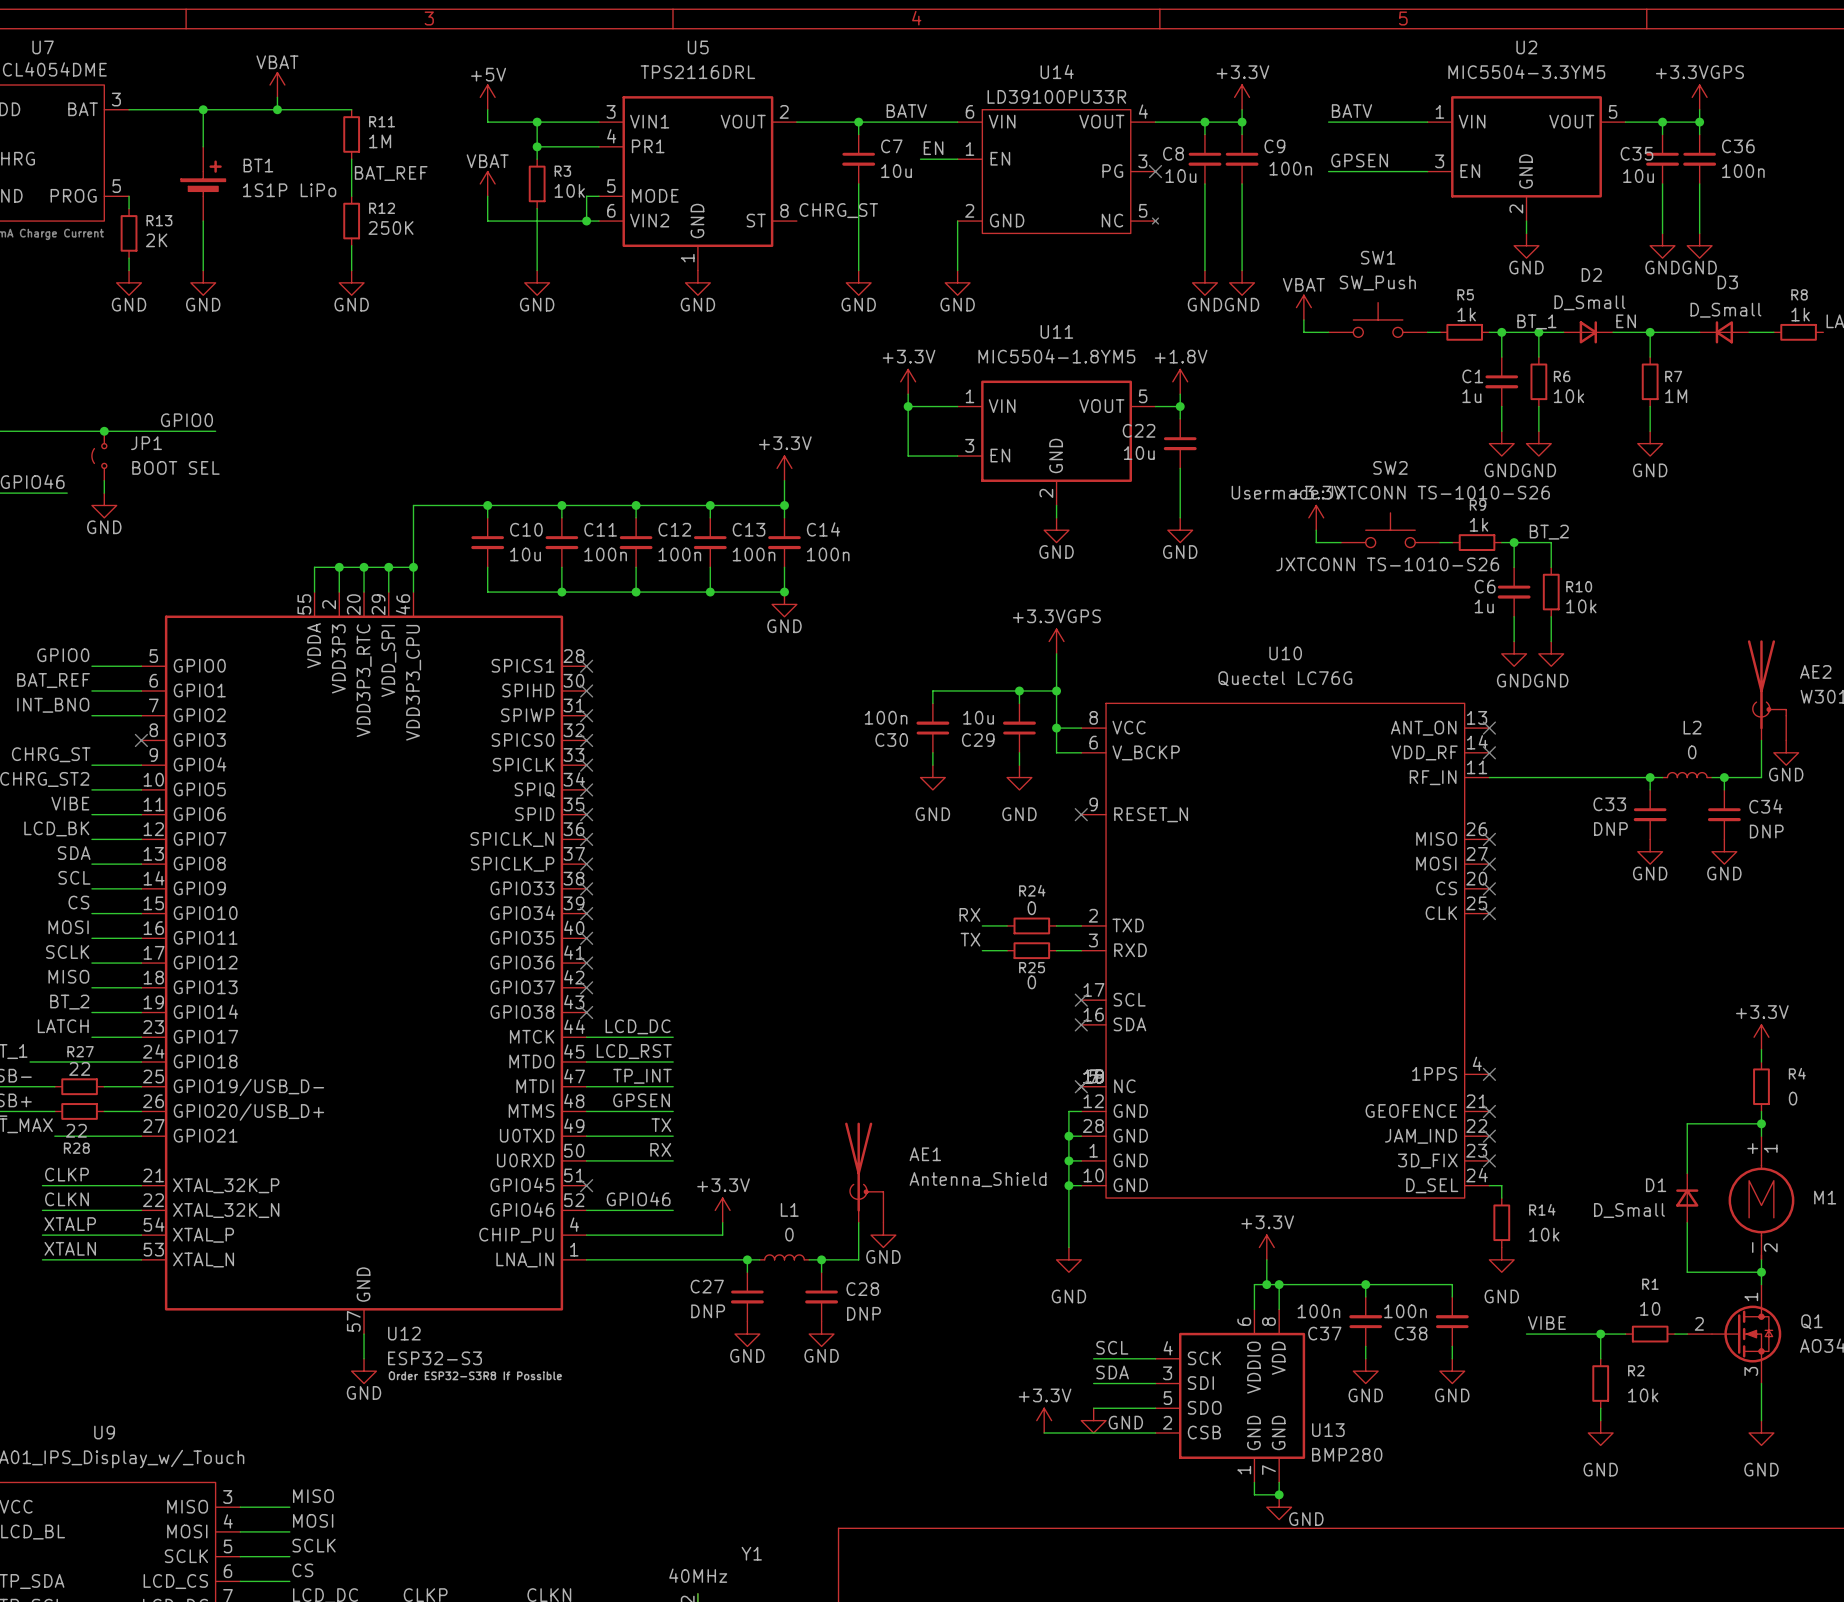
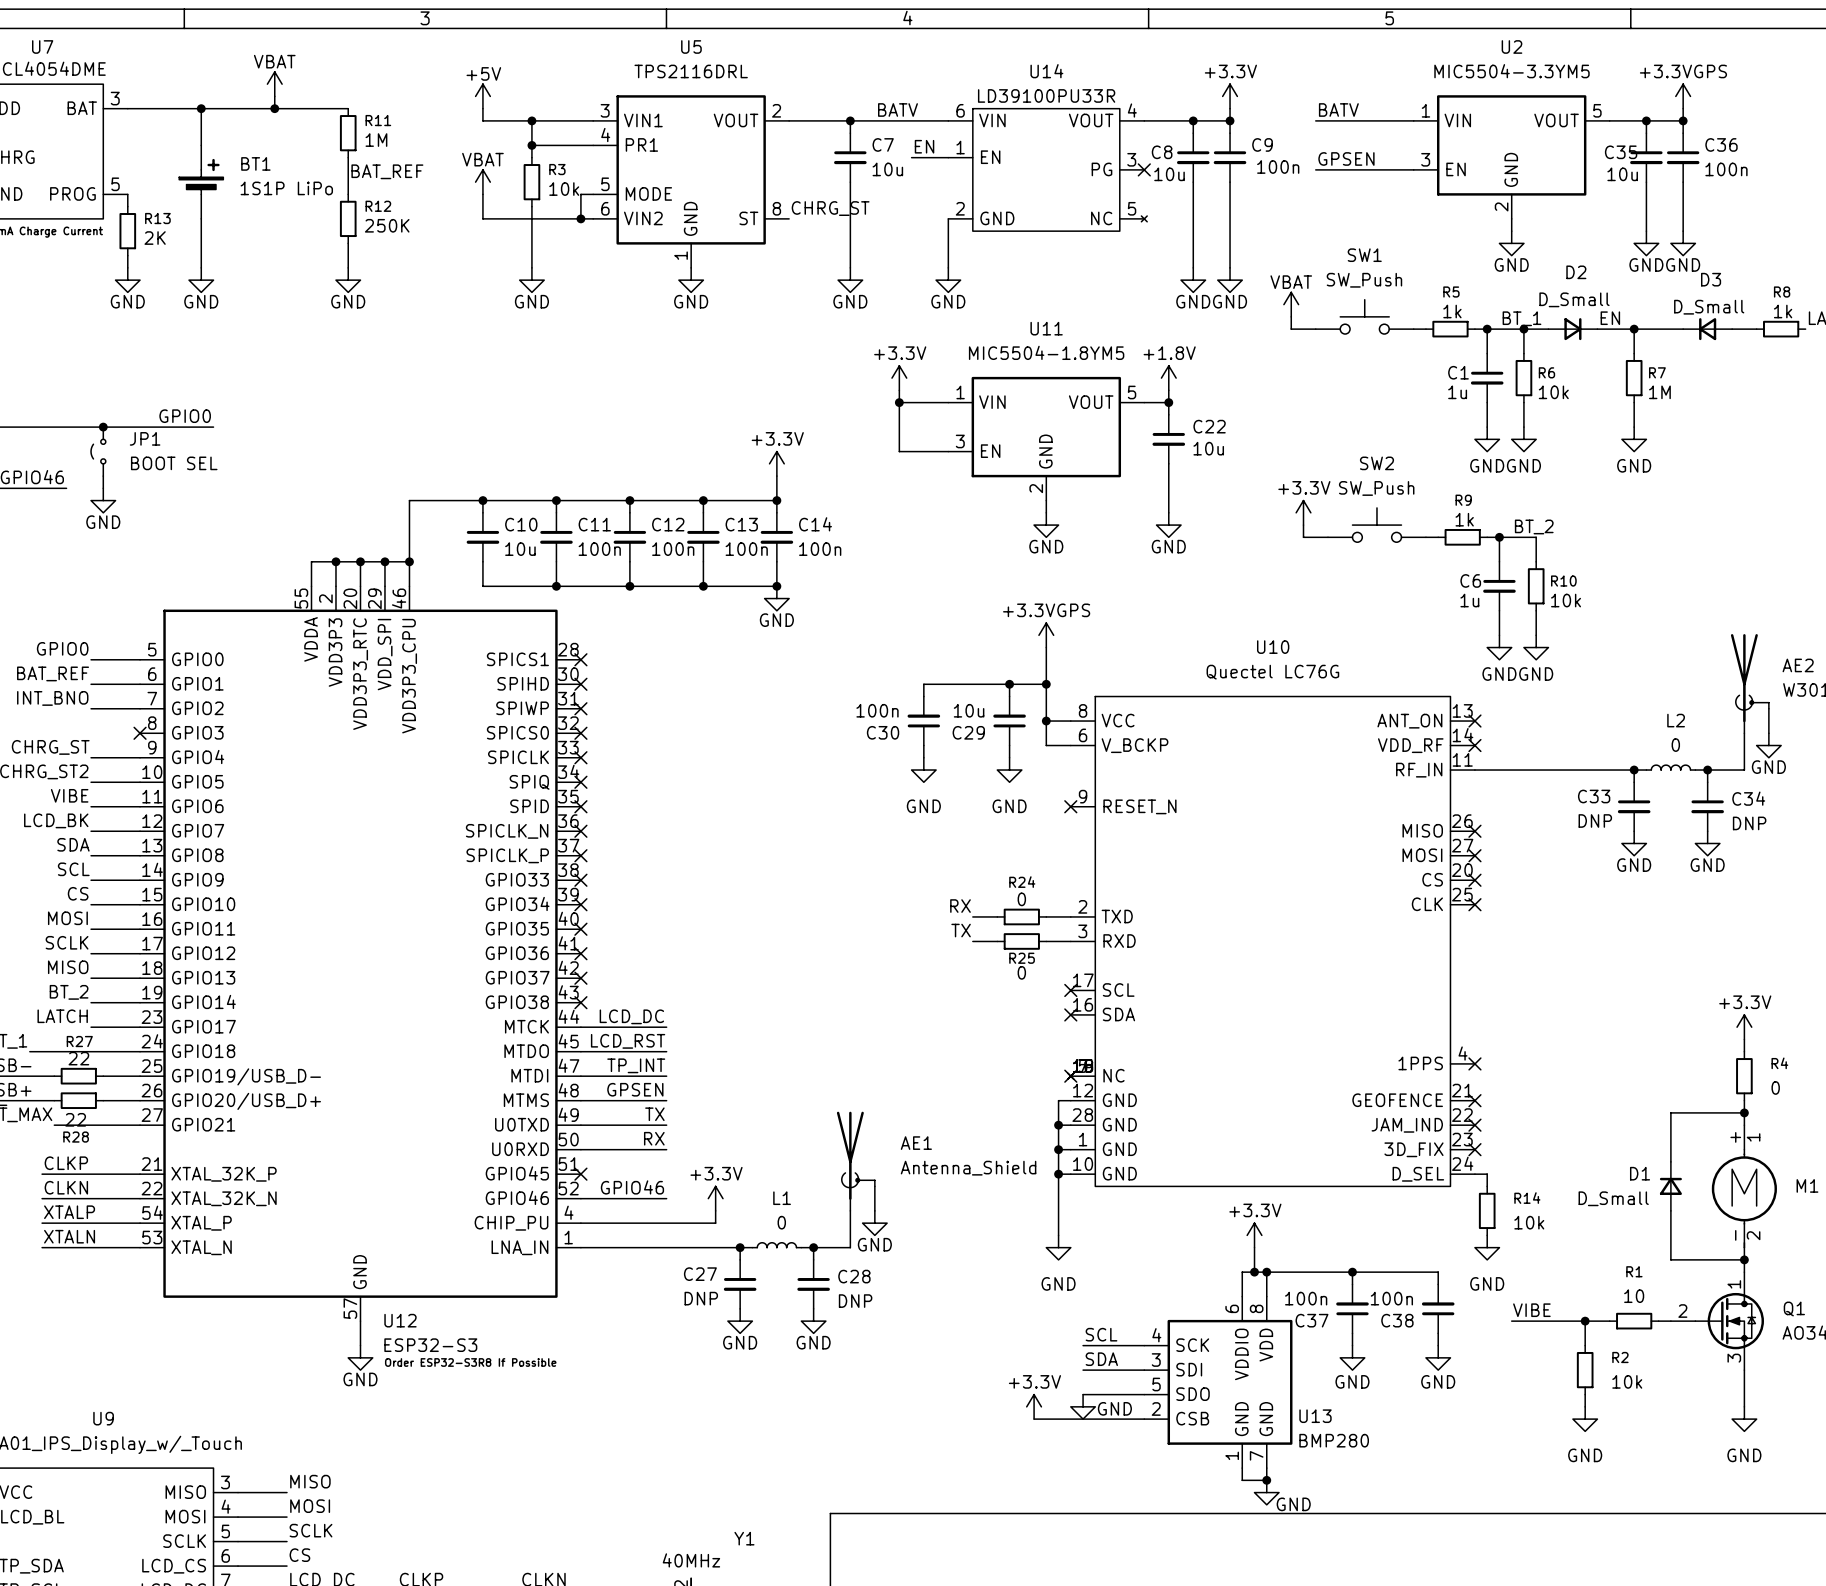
C22 name position: C22 (1139, 430) -> C22 (1209, 426)
C22 value position: 10u (1139, 453) -> 10u (1208, 448)
SW2 text: Usermade:JXTCONN TS-1010-S26 (1390, 492) -> none
SW2 value: JXTCONN TS-1010-S26 (1387, 564) -> SW_Push (1376, 488)

